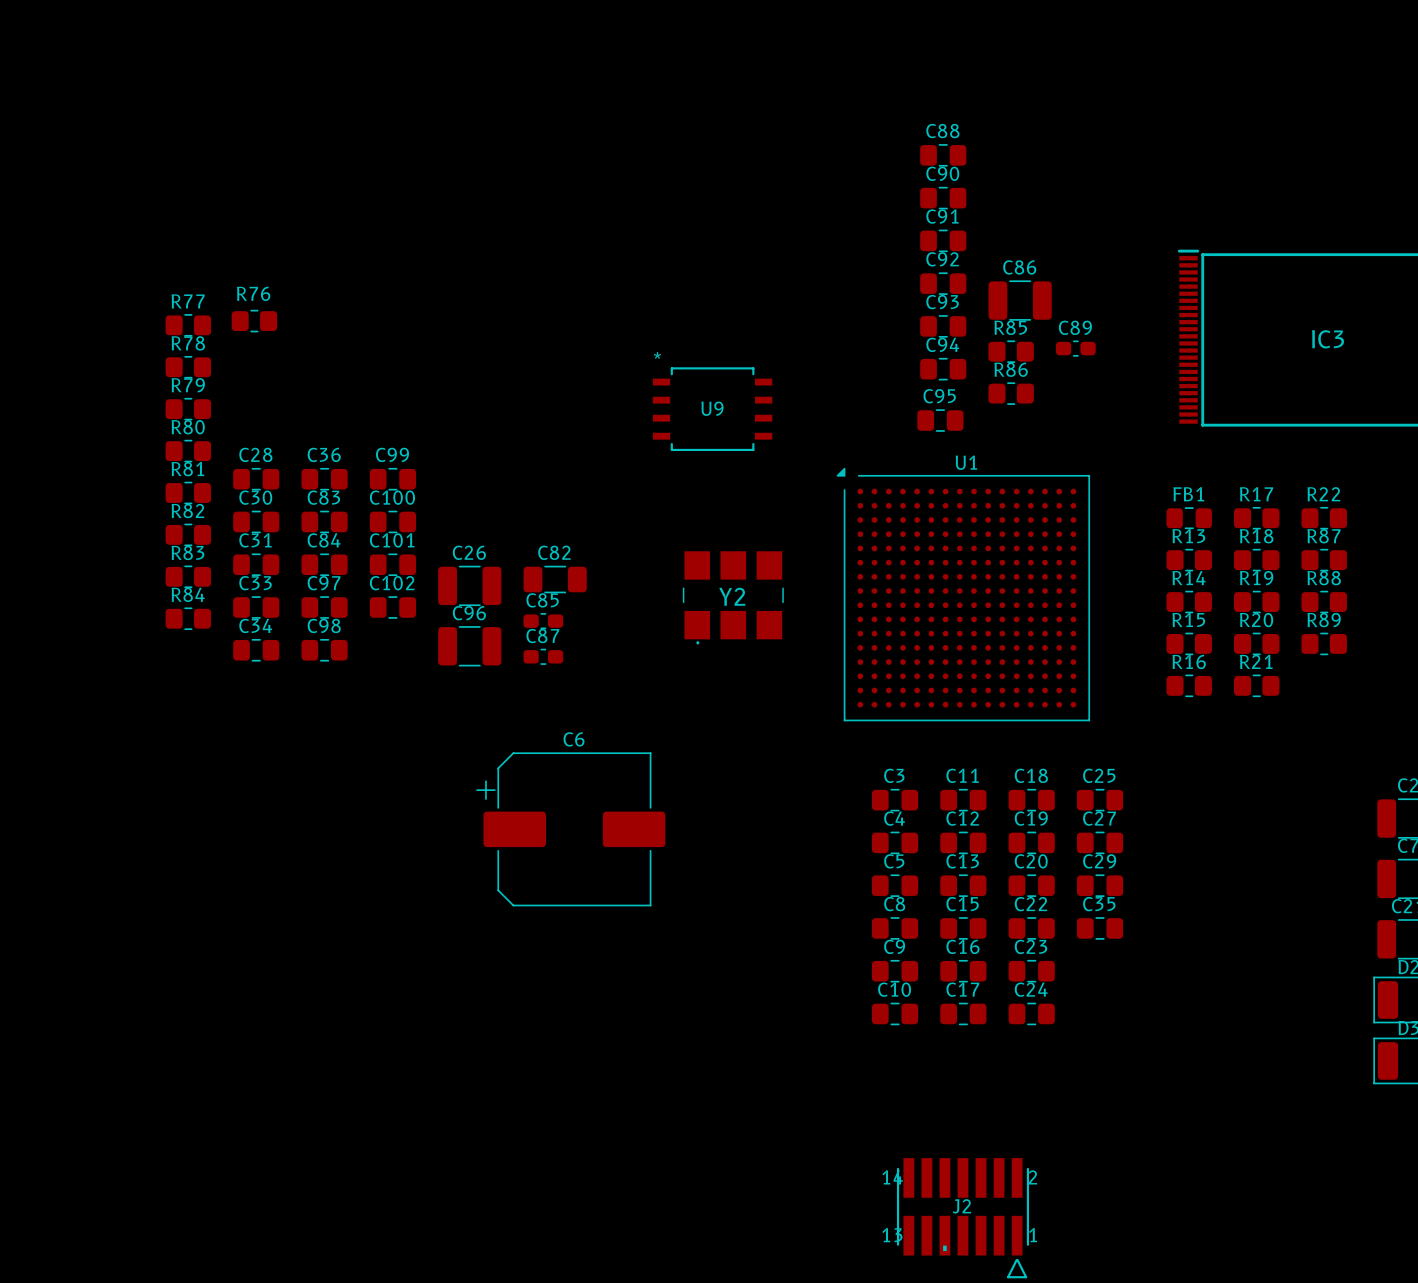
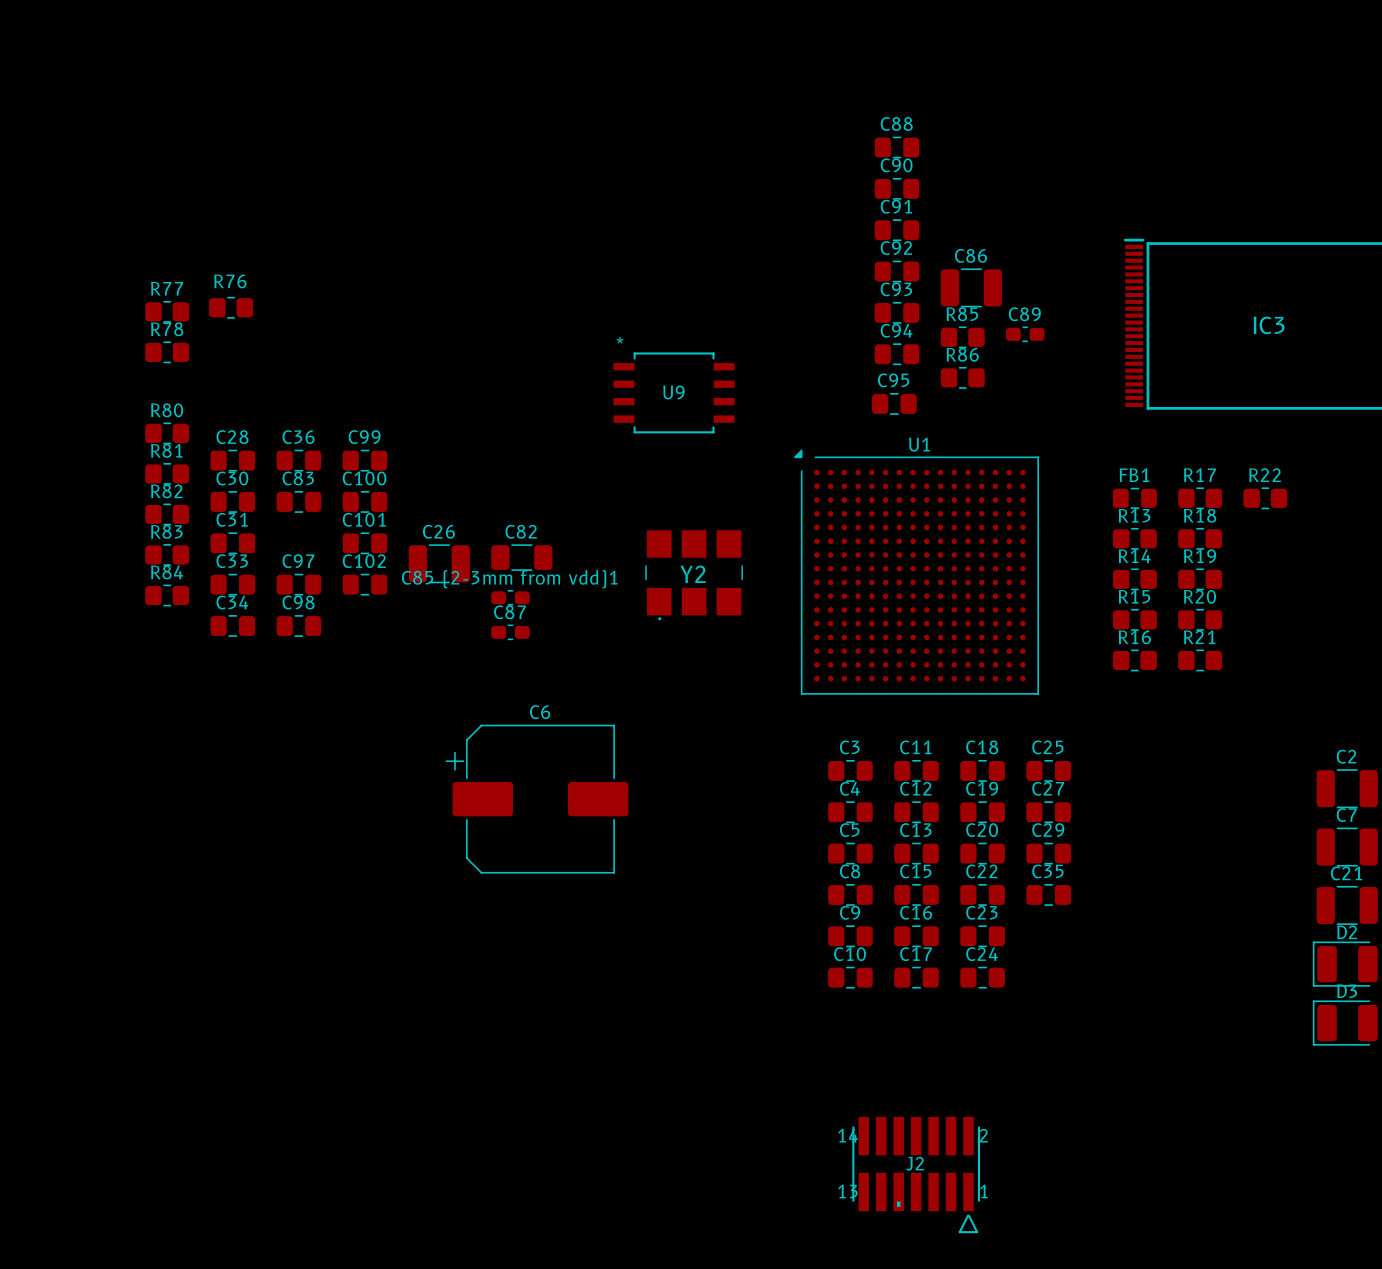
U9 footprint: [652, 367, 773, 452] -> [613, 352, 735, 434]
R79: (188, 409) -> none
R87: (1324, 560) -> none
C84: (324, 564) -> none
C85 name: C85 (542, 600) -> C85 (2-3mm from vdd)1 (509, 579)
R88: (1324, 602) -> none
R89: (1324, 643) -> none
C96: (469, 646) -> none

